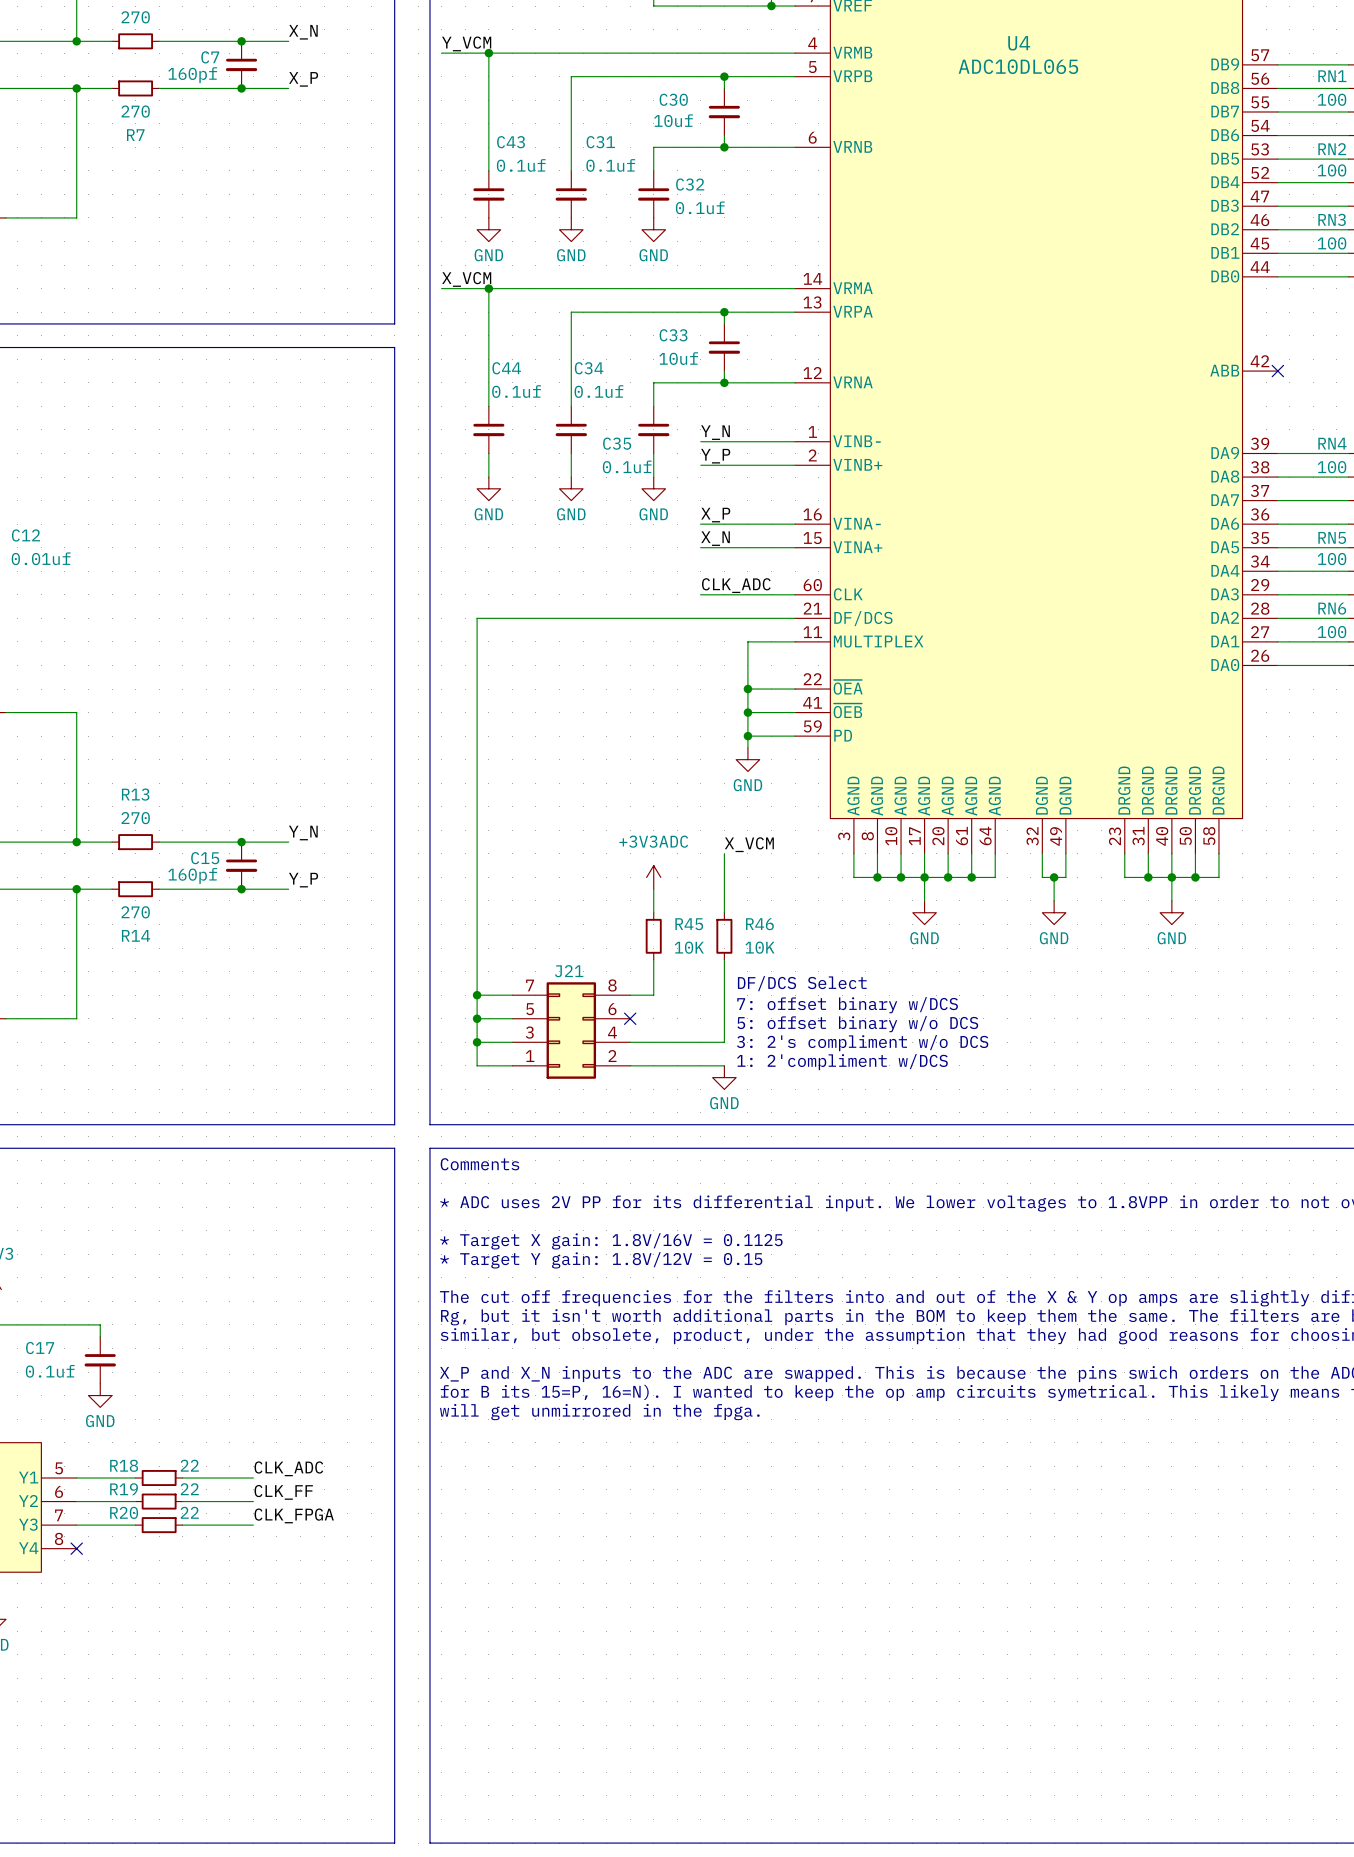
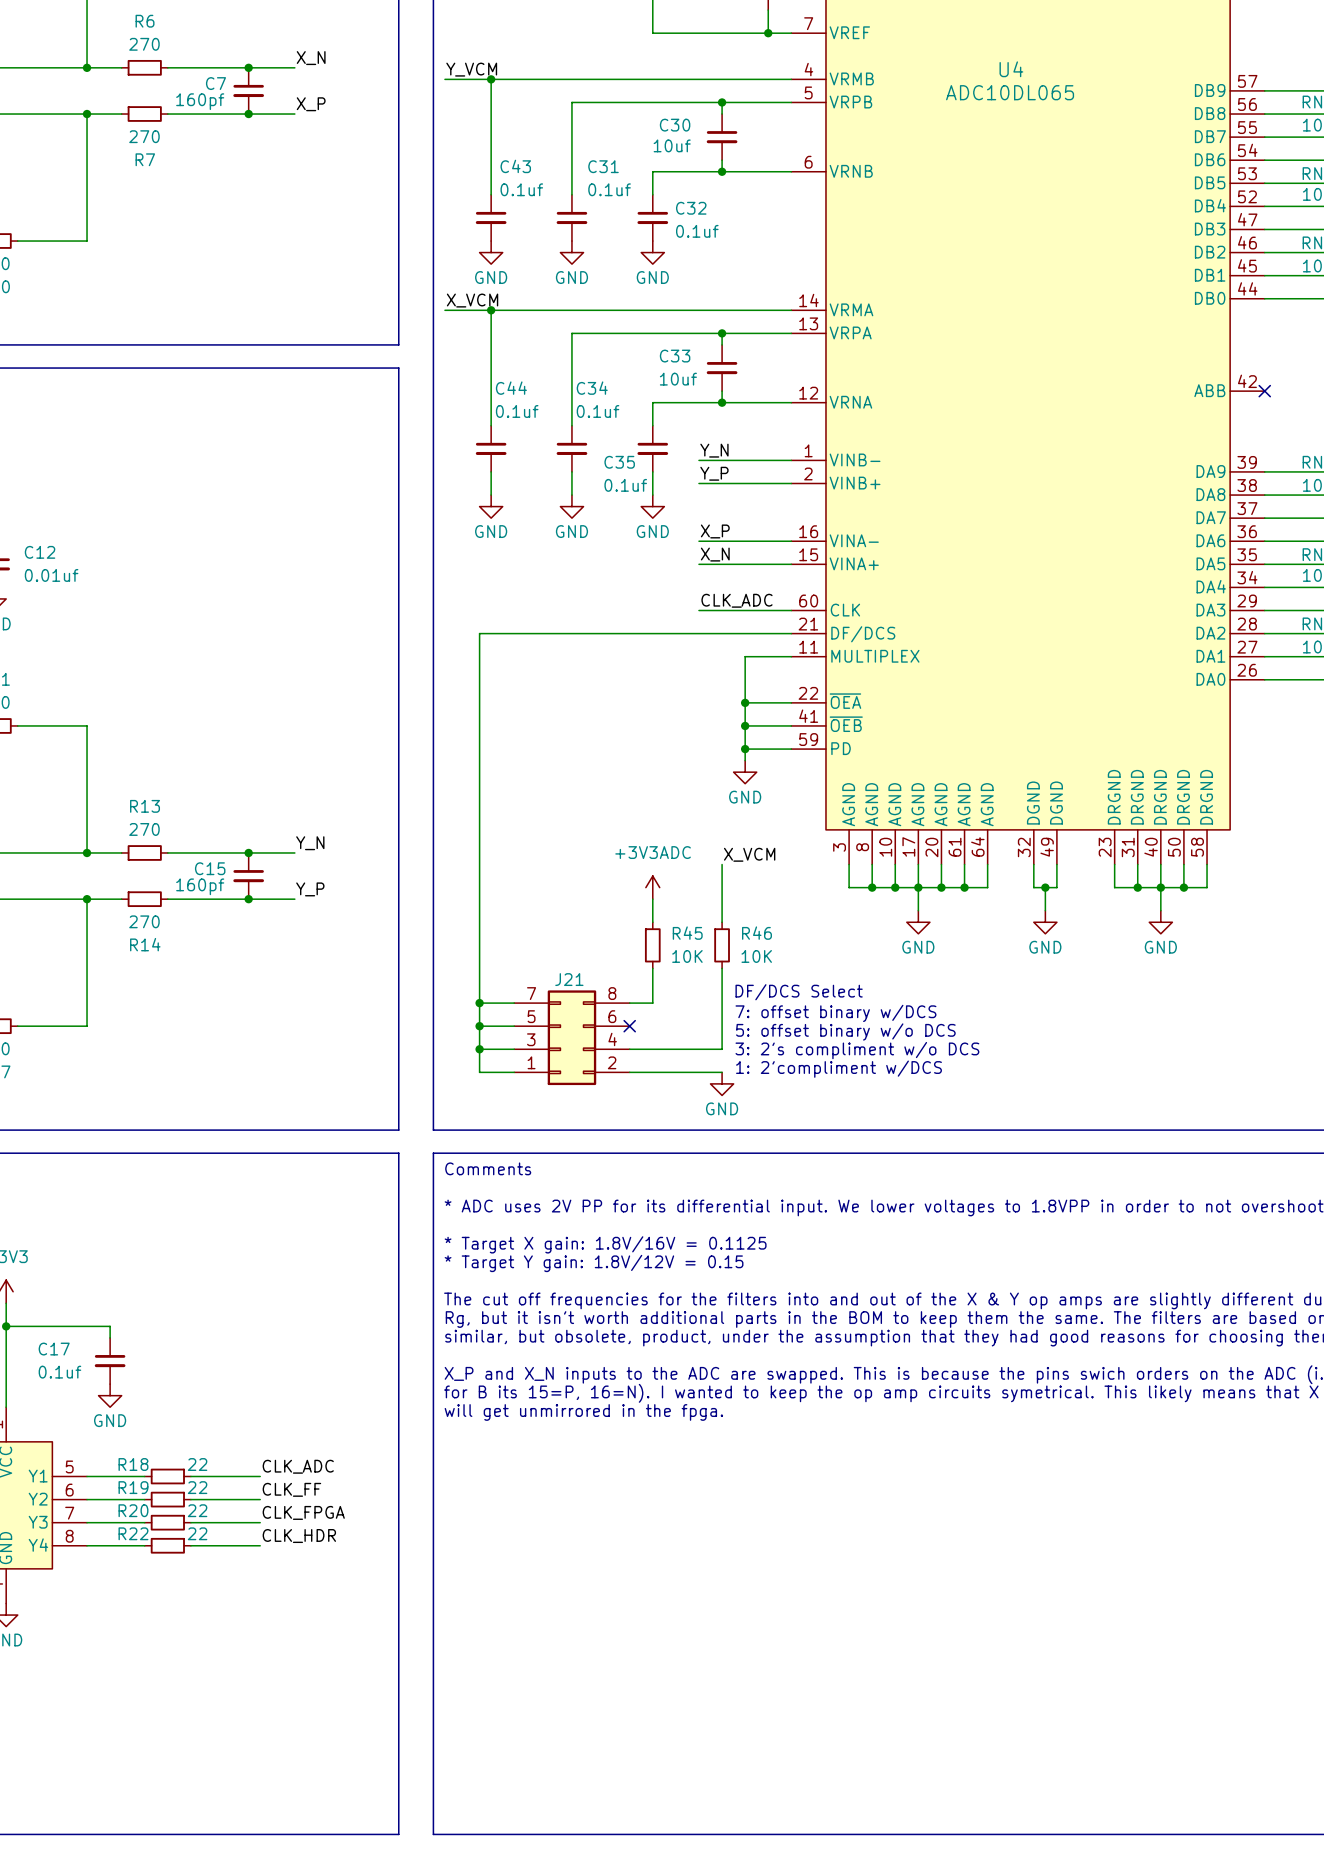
label: none -> CLK_HDR (299, 1536)
wire: none -> (87, 1545) (144, 1545)
no-connect mark: (76, 1548) -> none
R22: none -> 22 (167, 1545)
wire: none -> (190, 1545) (260, 1545)

